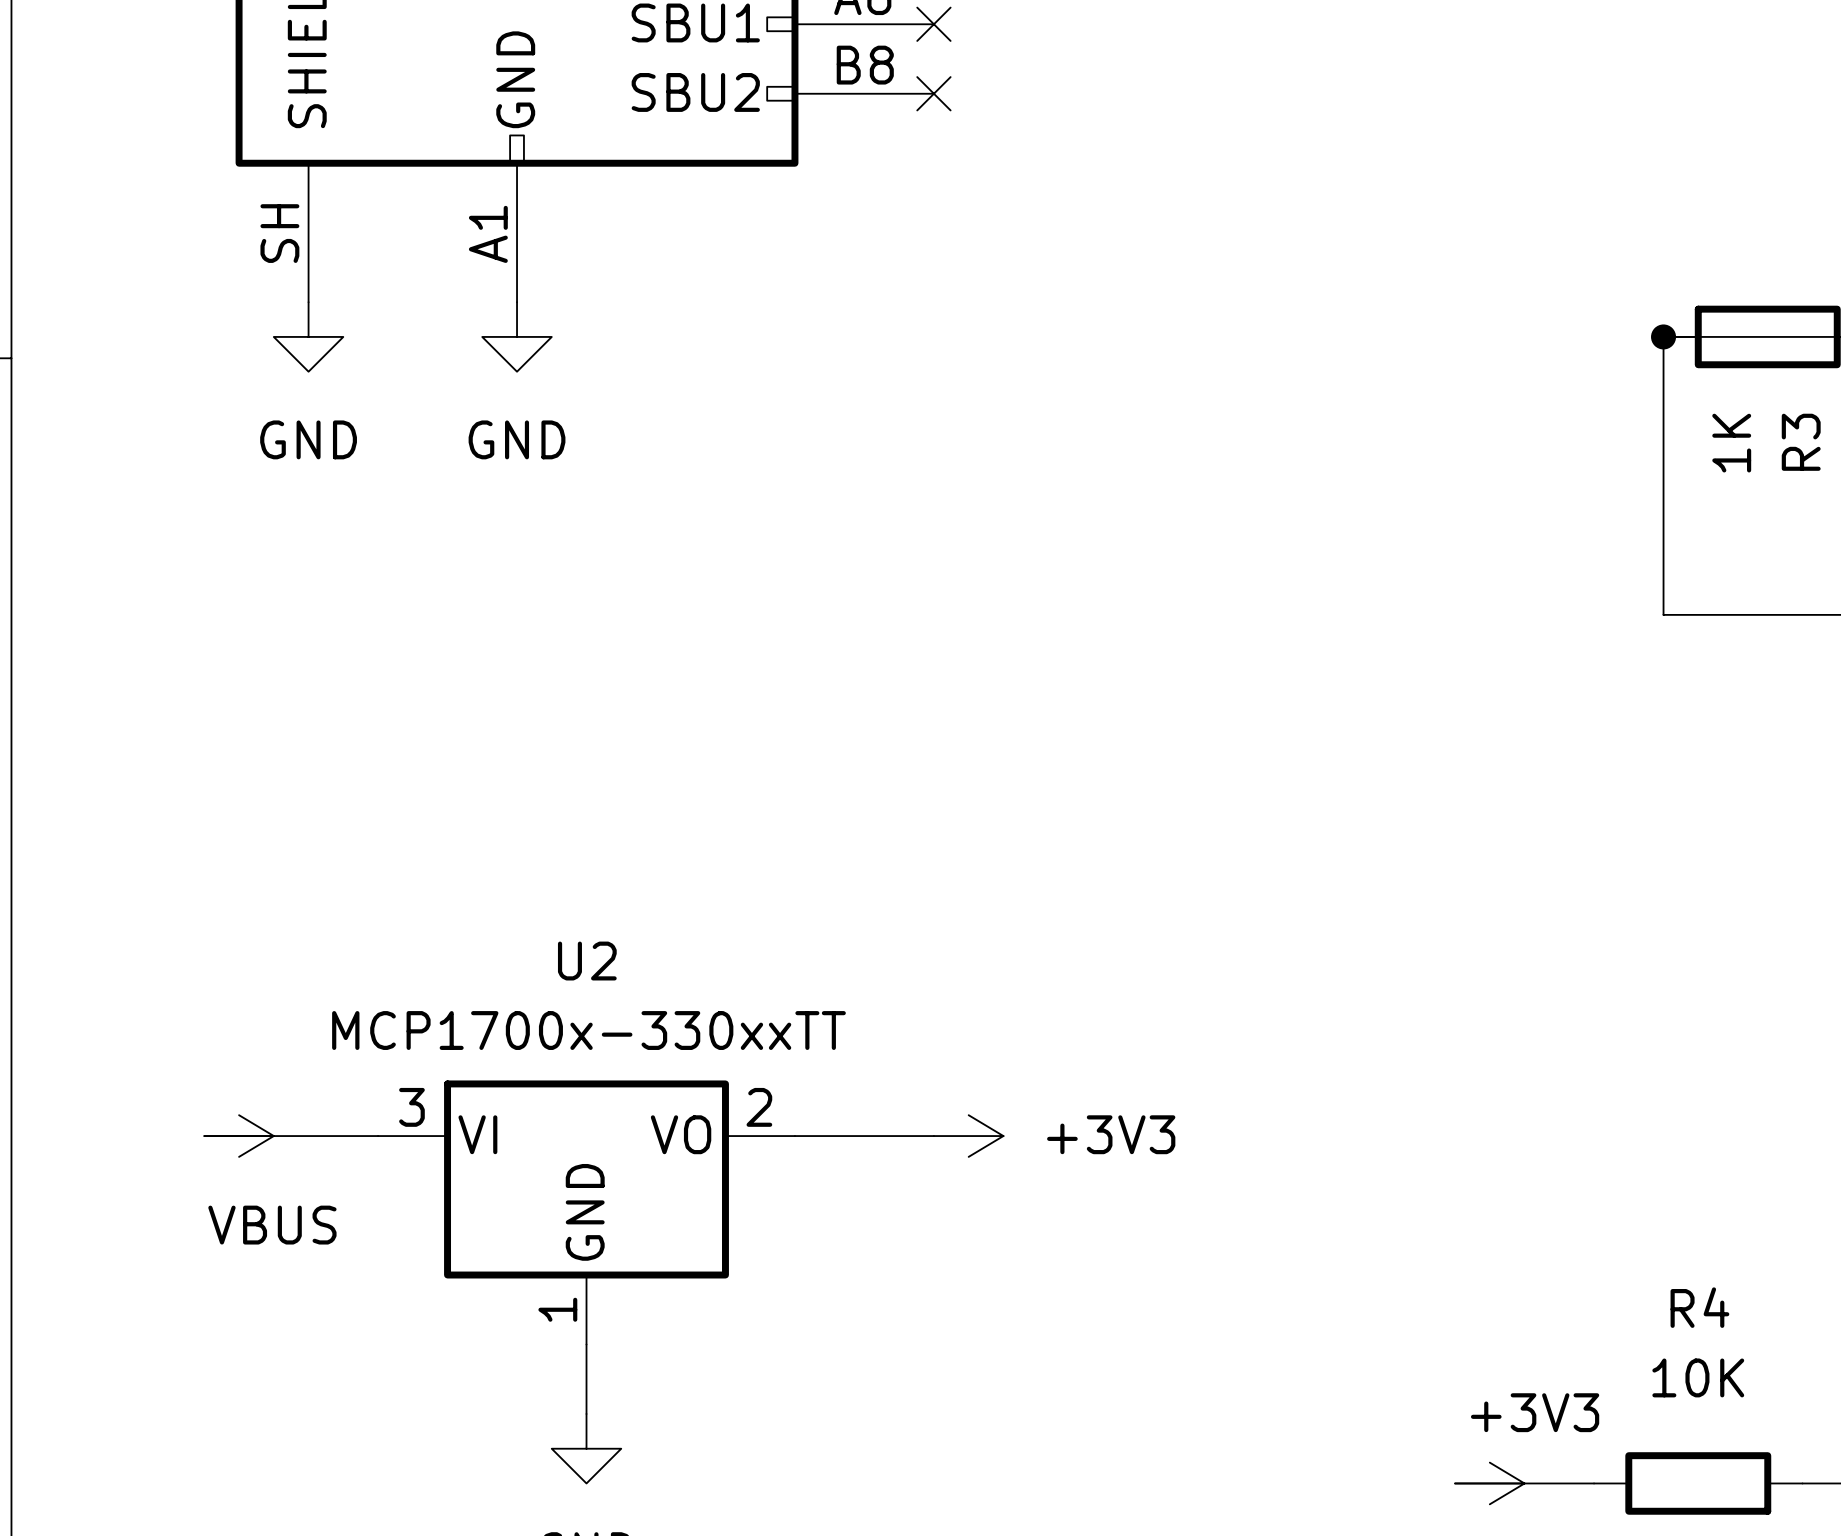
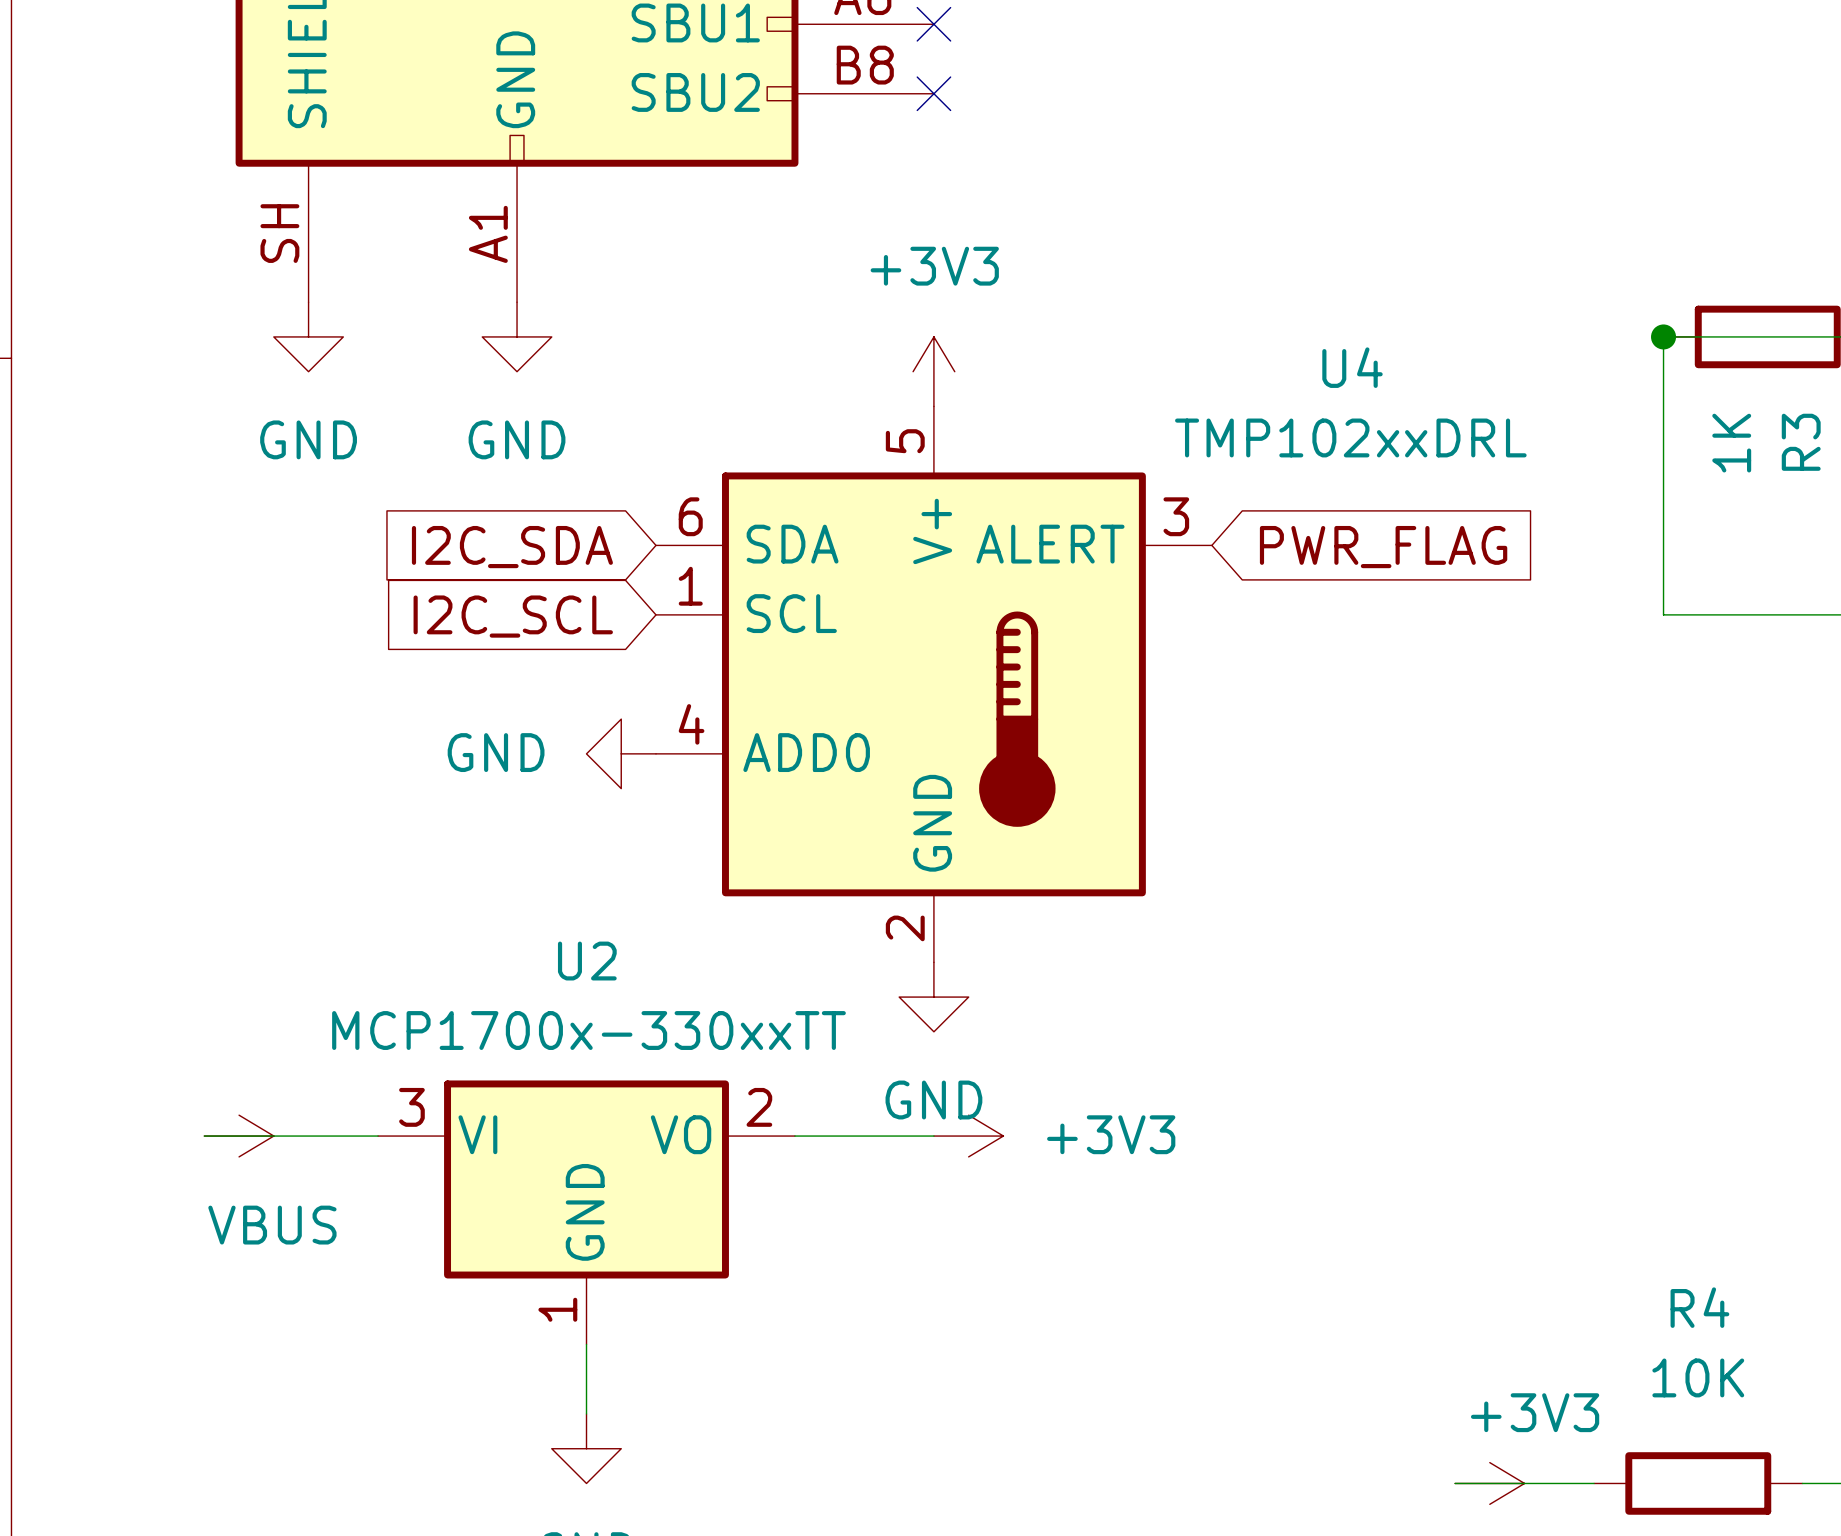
power symbol: none -> +3V3 (933, 371)
global label: none -> I2C_SDA (512, 547)
global label: none -> PWR_FLAG (1383, 547)
global label: none -> I2C_SCL (513, 616)
U4: none -> TMP102xxDRL (933, 684)
power symbol: none -> GND (621, 753)
power symbol: none -> GND (933, 997)

